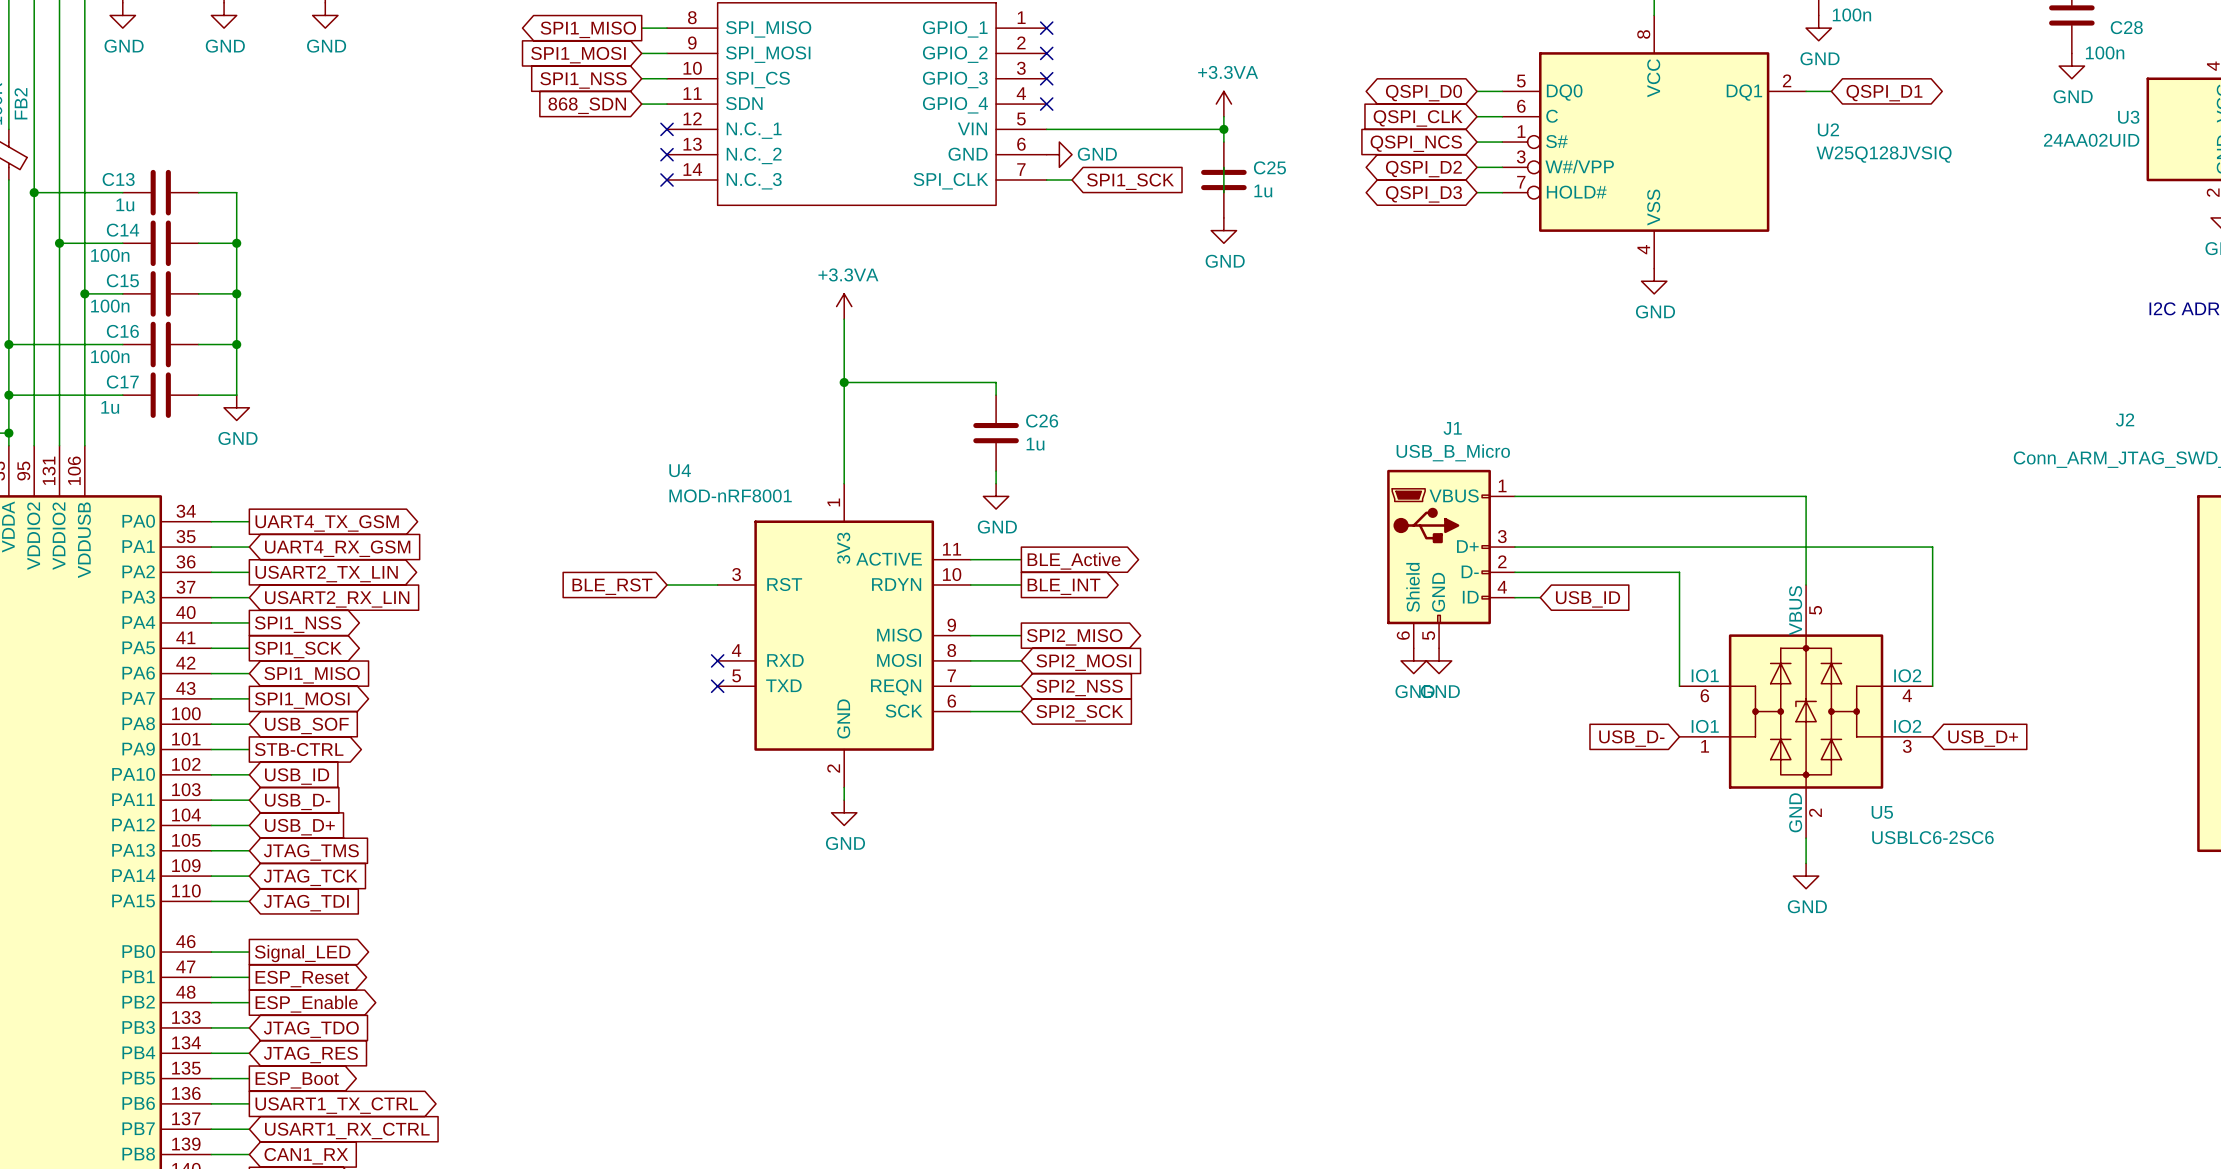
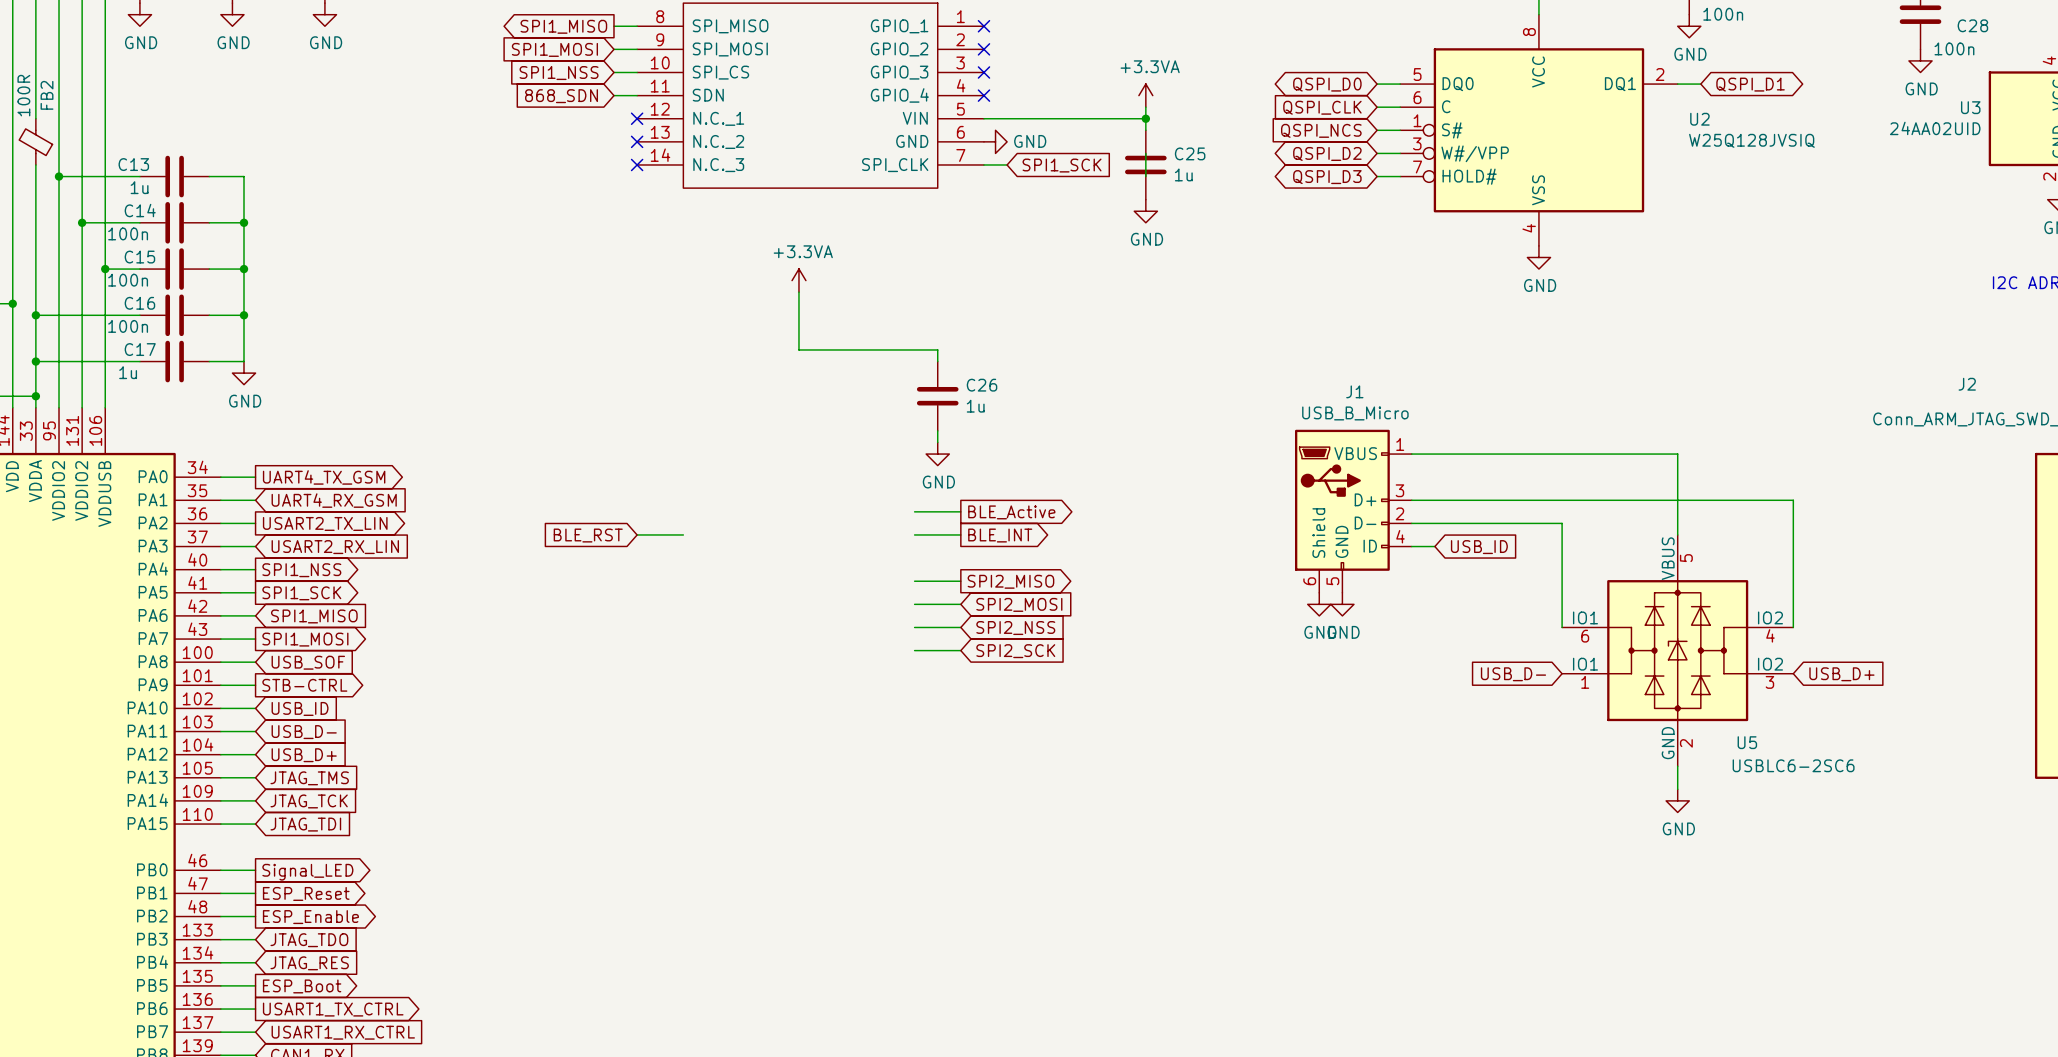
wire: (844, 382) (844, 483) -> none
junction: (844, 382) -> none
U4: MOD-nRF8001 (844, 635) -> none
no-connect mark: (717, 660) -> none
no-connect mark: (717, 686) -> none
wire: (844, 787) (844, 800) -> none
power symbol: GND (844, 812) -> none

